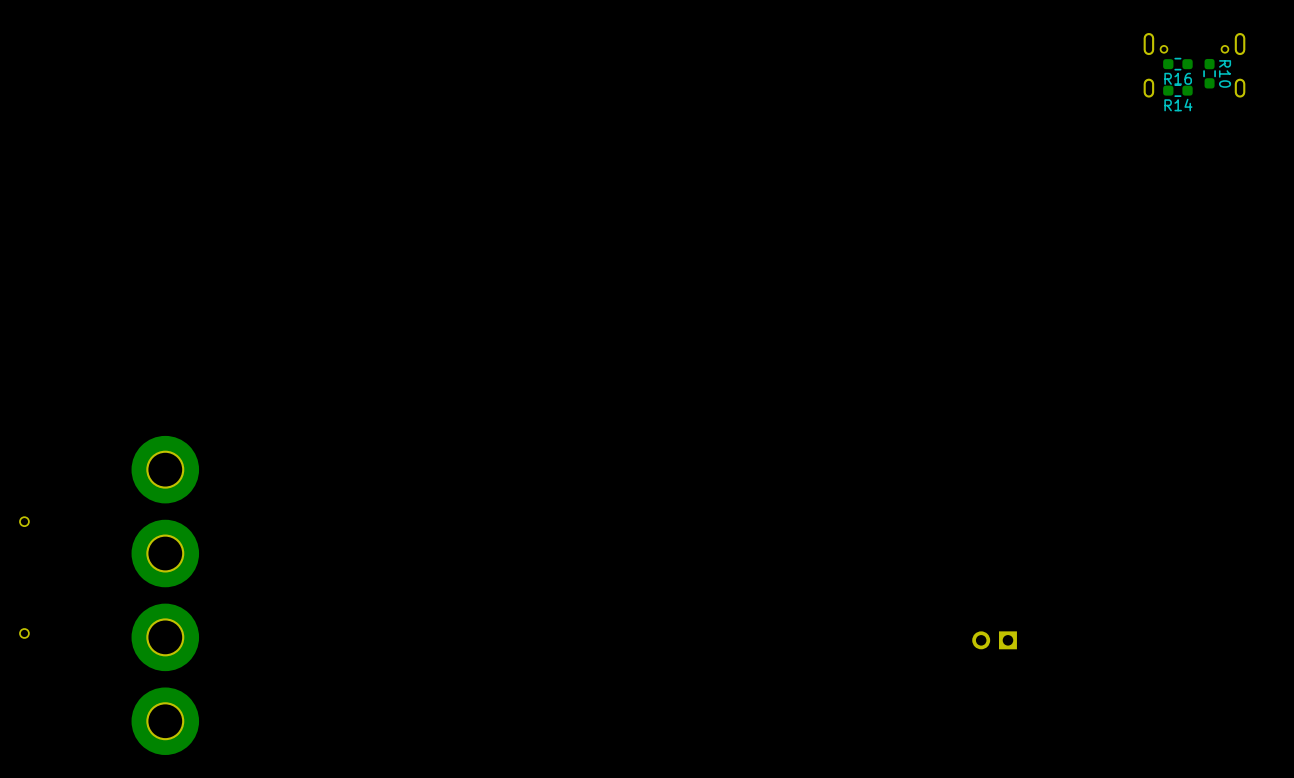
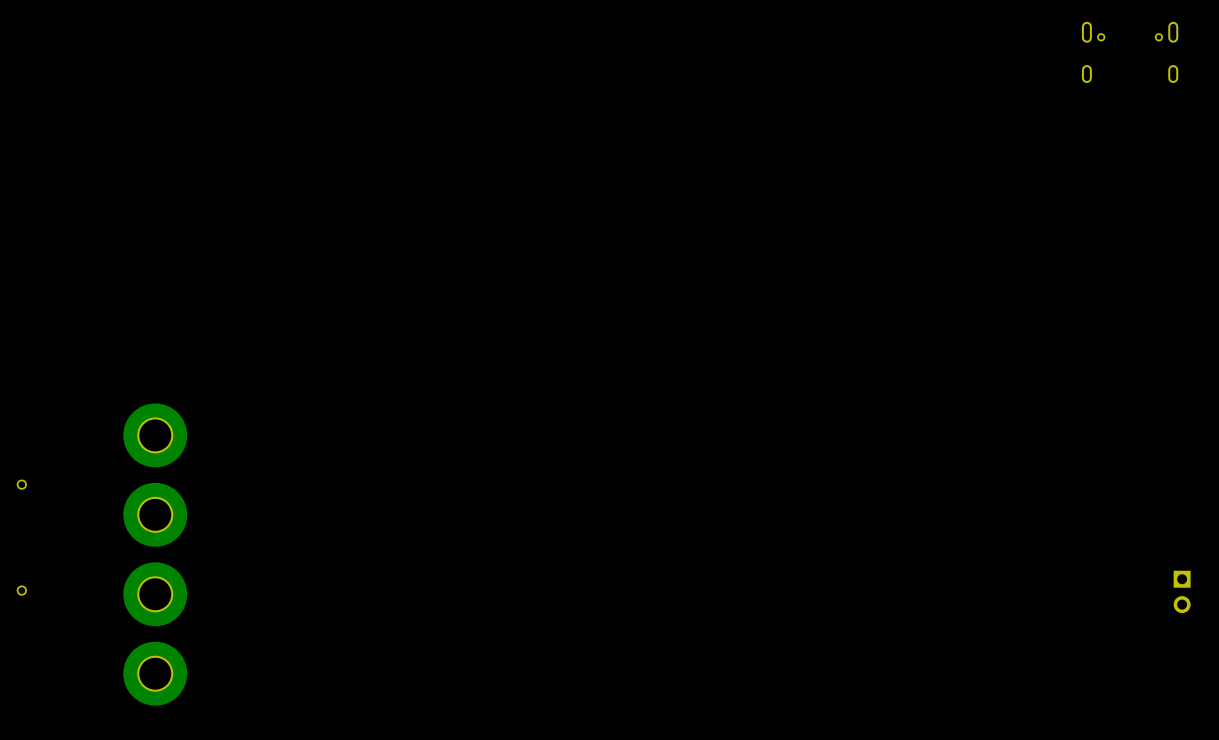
R16: (1177, 64) -> none
R10: (1209, 73) -> none
R14: (1177, 90) -> none
part rotation: 0° (994, 640) -> 90° counterclockwise (1182, 591)
part position: (994, 640) -> (1182, 591)

